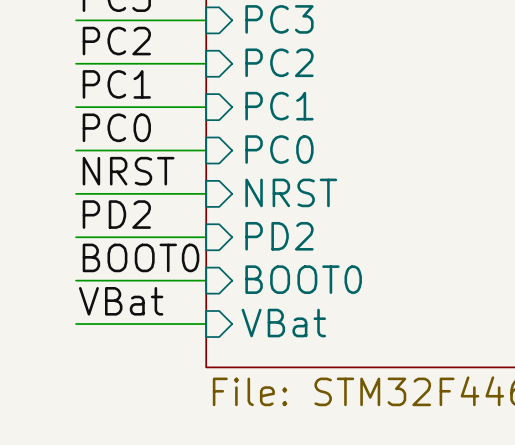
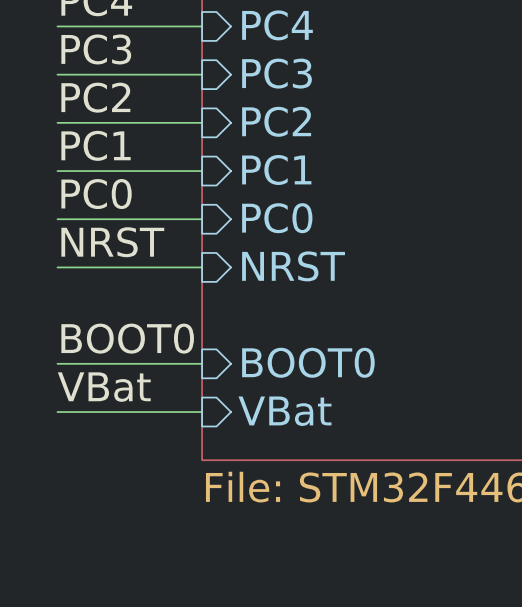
label: PD2 (116, 214) -> none
sheet pin: PD2 (279, 236) -> none
wire: (76, 237) (206, 237) -> none

